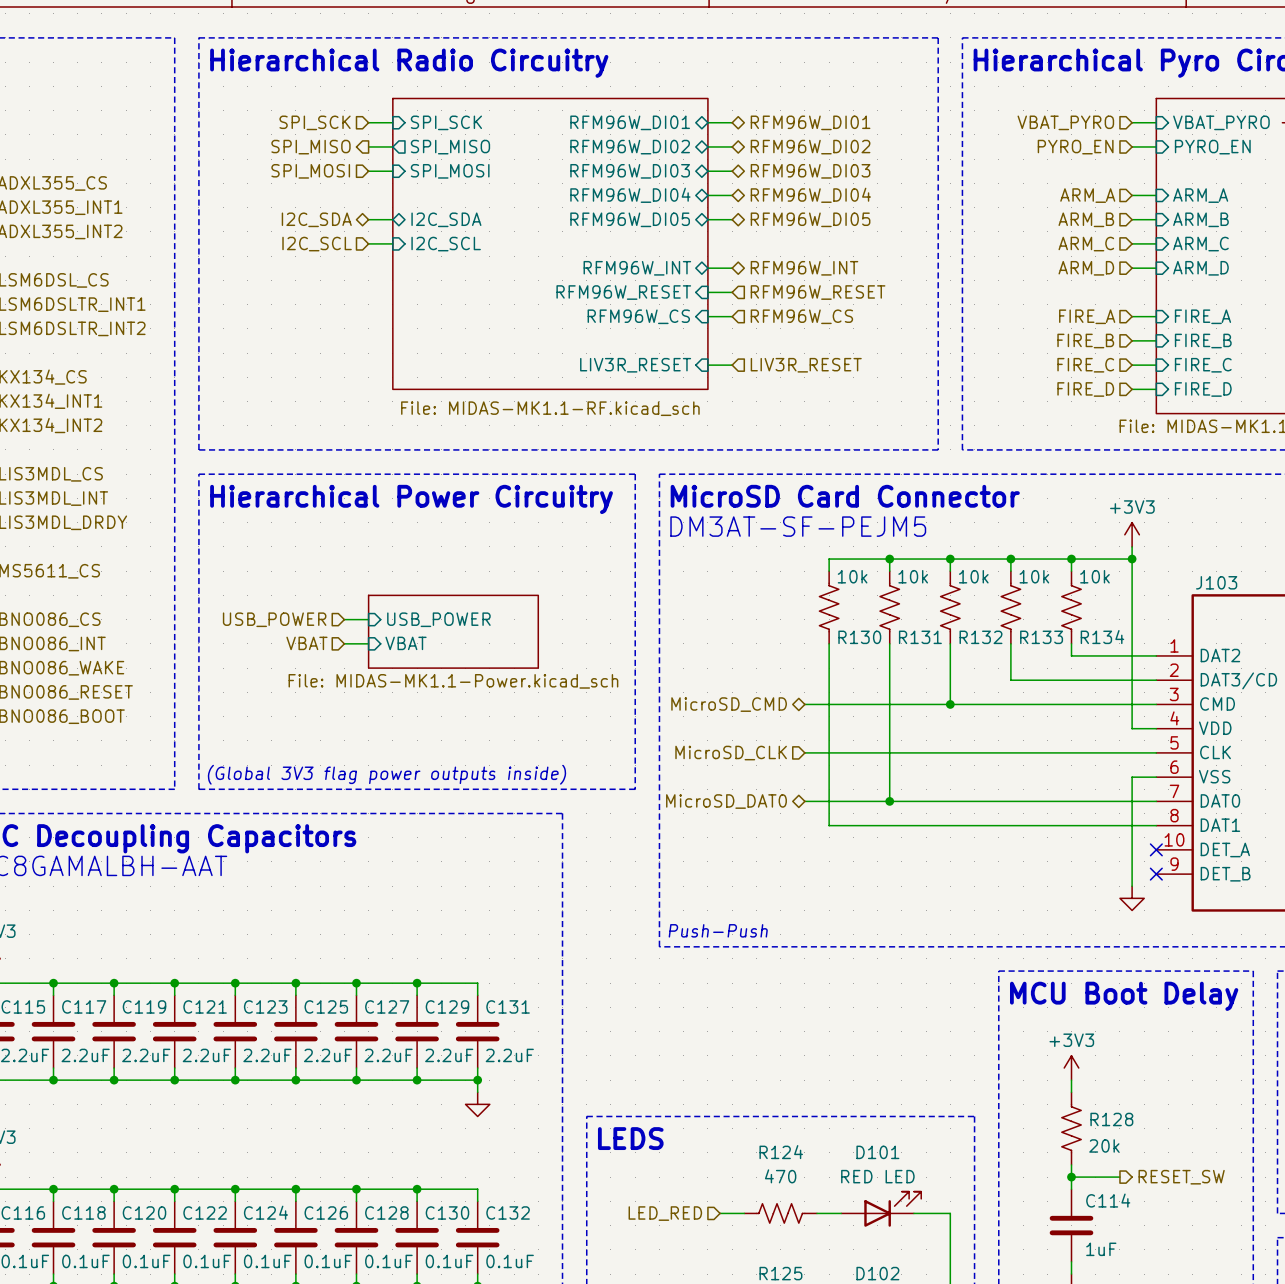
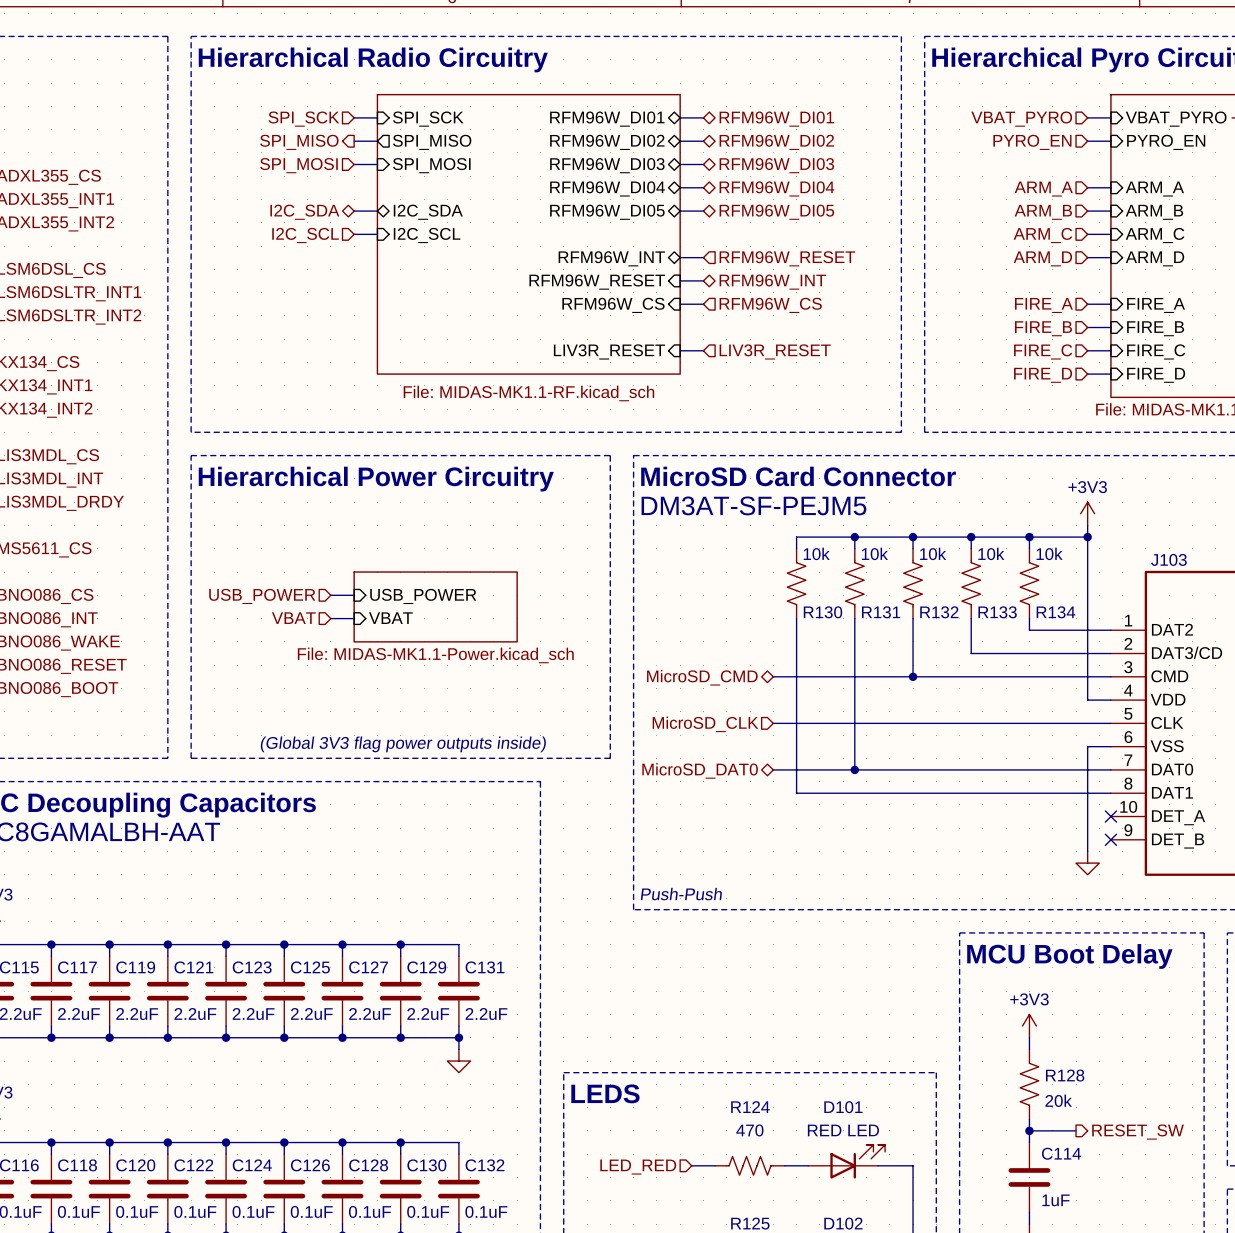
hierarchical label shape: bidirectional (804, 268) -> input (787, 258)
hierarchical label: RFM96W_INT (804, 268) -> RFM96W_RESET (787, 258)
hierarchical label shape: input (818, 292) -> bidirectional (772, 282)
hierarchical label: RFM96W_RESET (818, 292) -> RFM96W_INT (772, 282)

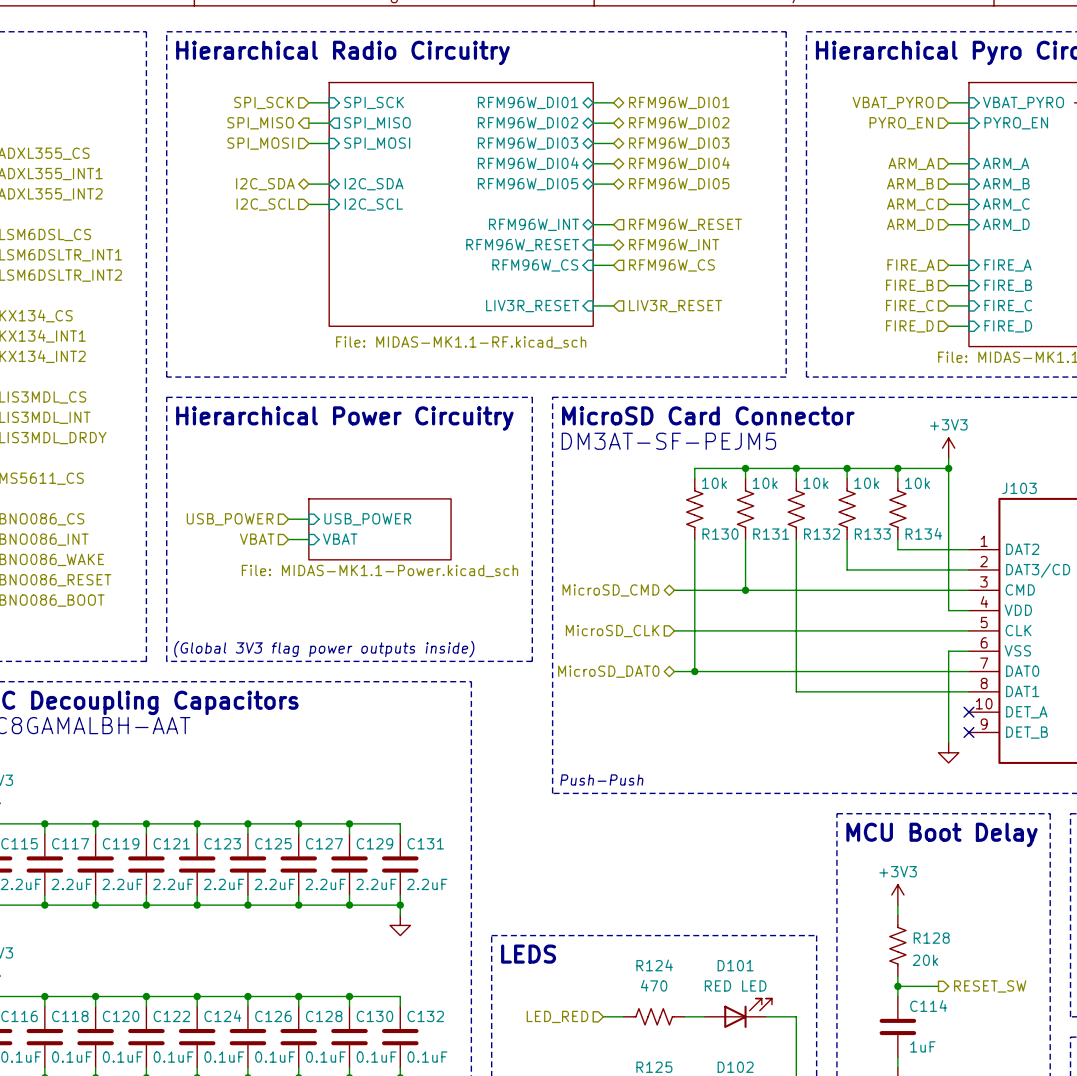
wire: (854, 676) (854, 769) -> none
junction: none -> (745, 590)
junction: (913, 676) -> none
wire: (796, 769) (796, 793) (913, 793) -> (796, 590) (796, 691)
junction: none -> (694, 671)
junction: (854, 769) -> none

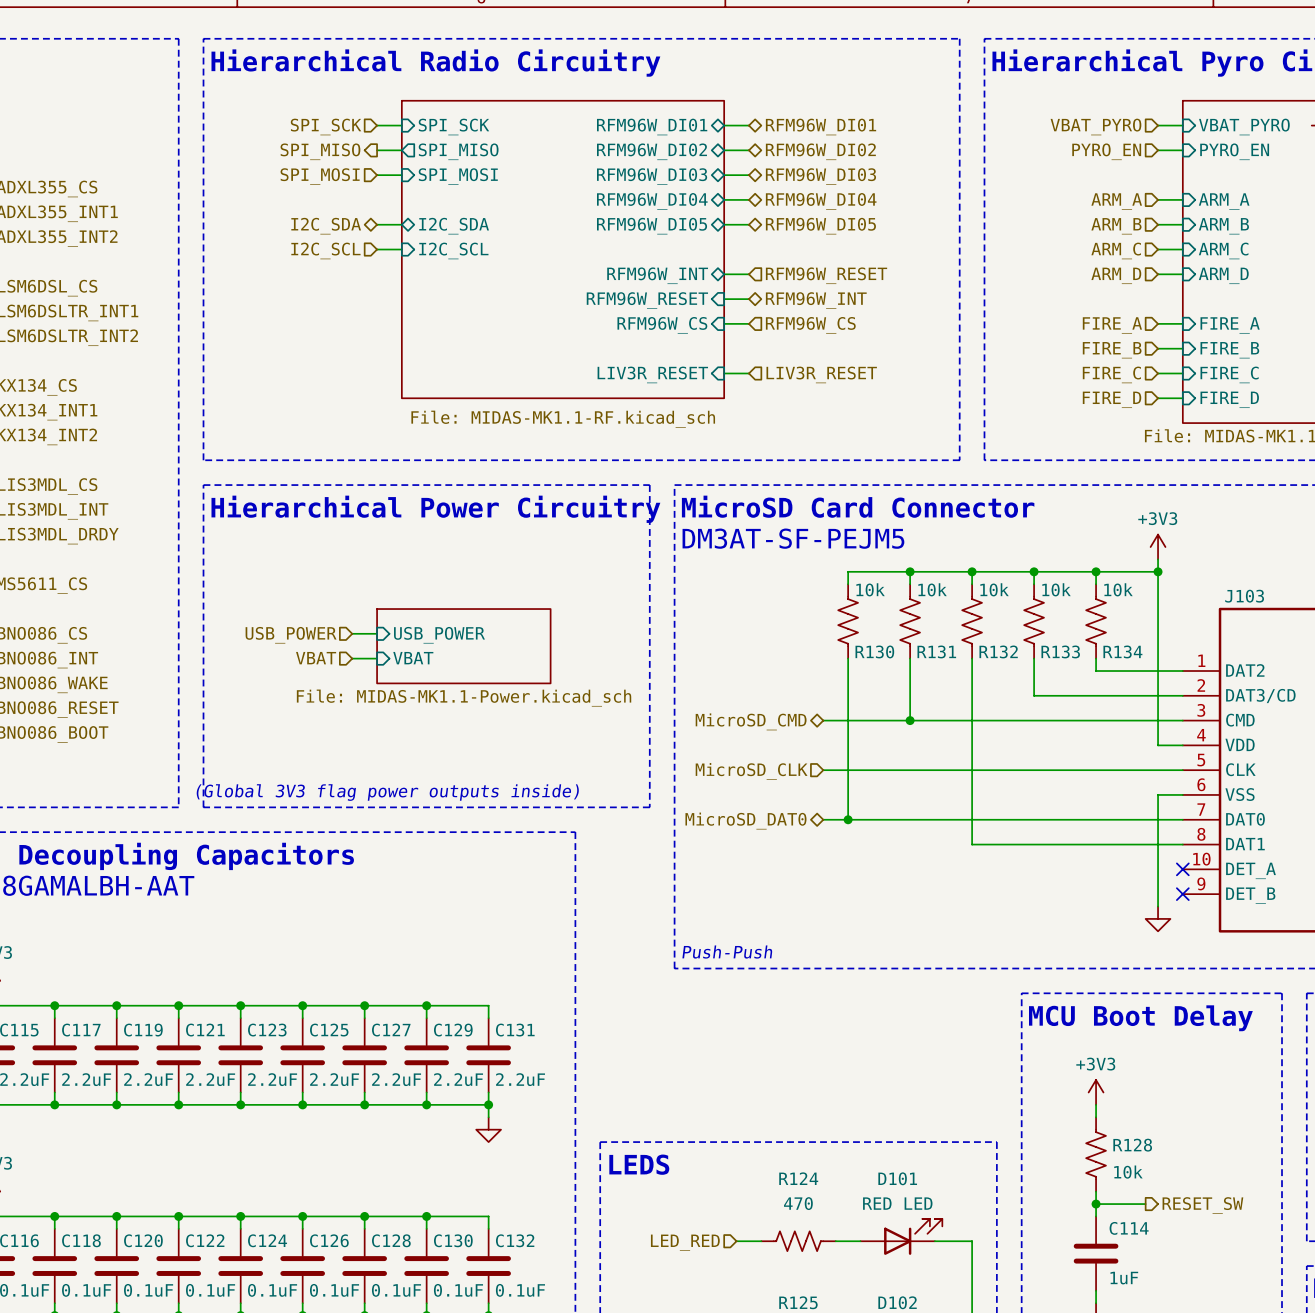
R128 value: 20k (925, 960) -> 10k (1128, 1172)

